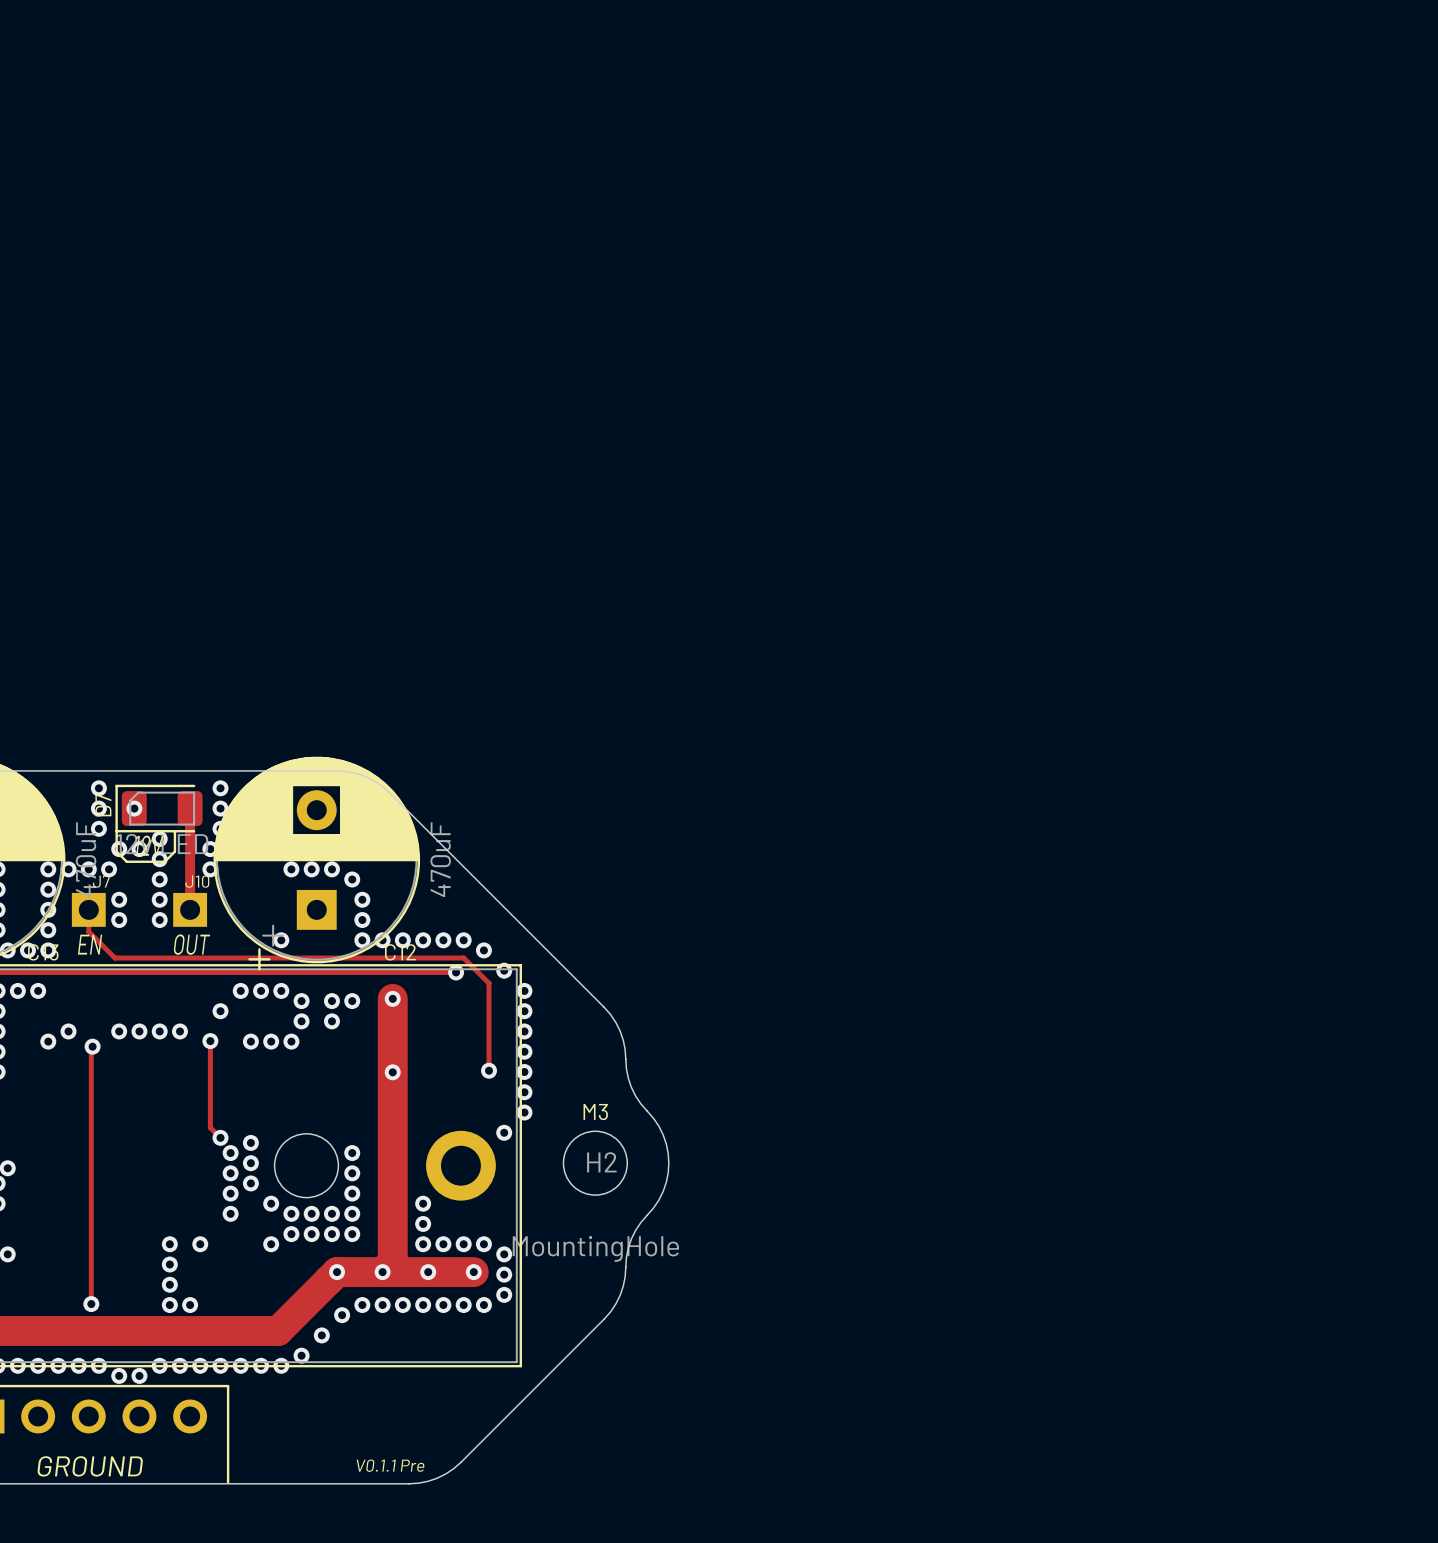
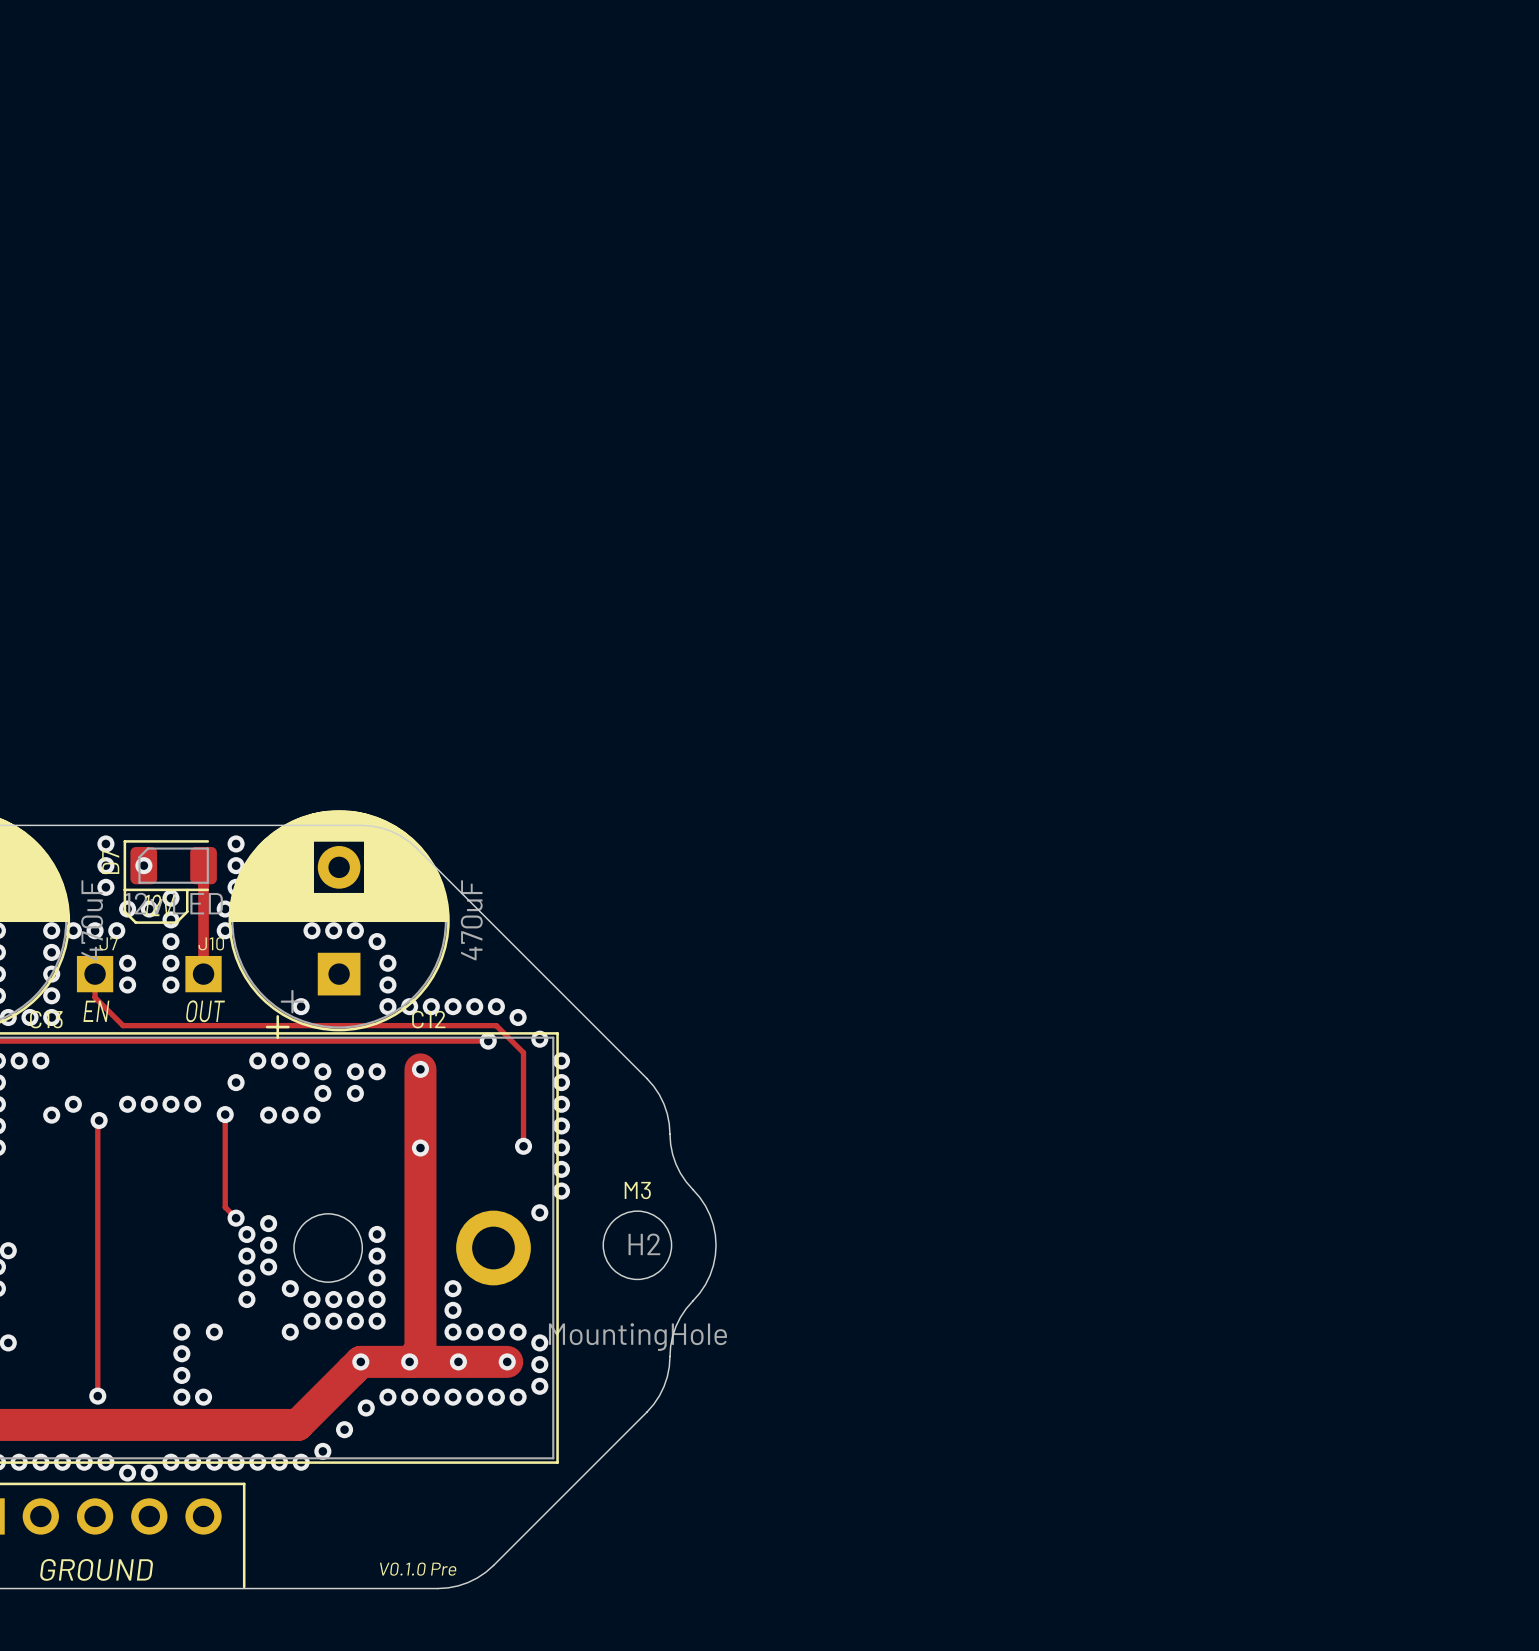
text: V0.1.1 Pre (390, 1465) -> V0.1.0 Pre (418, 1569)

